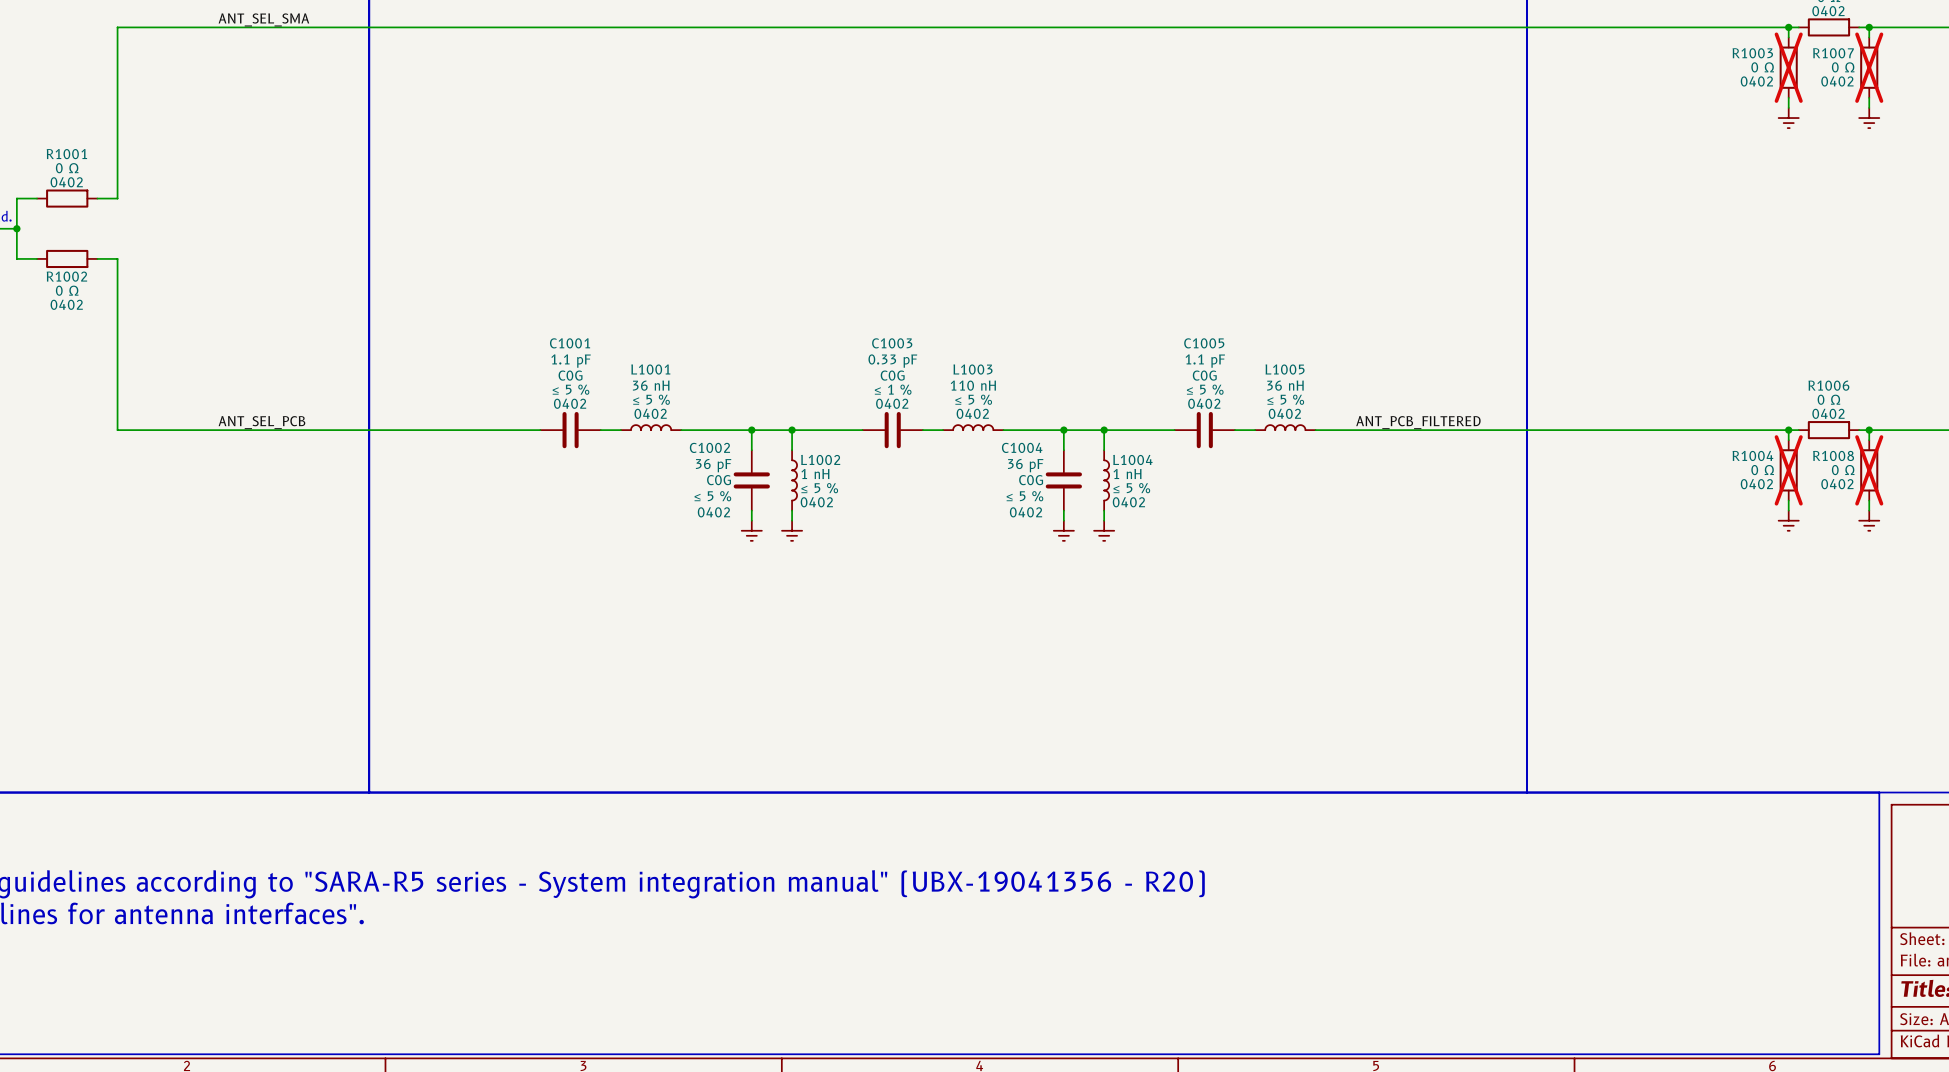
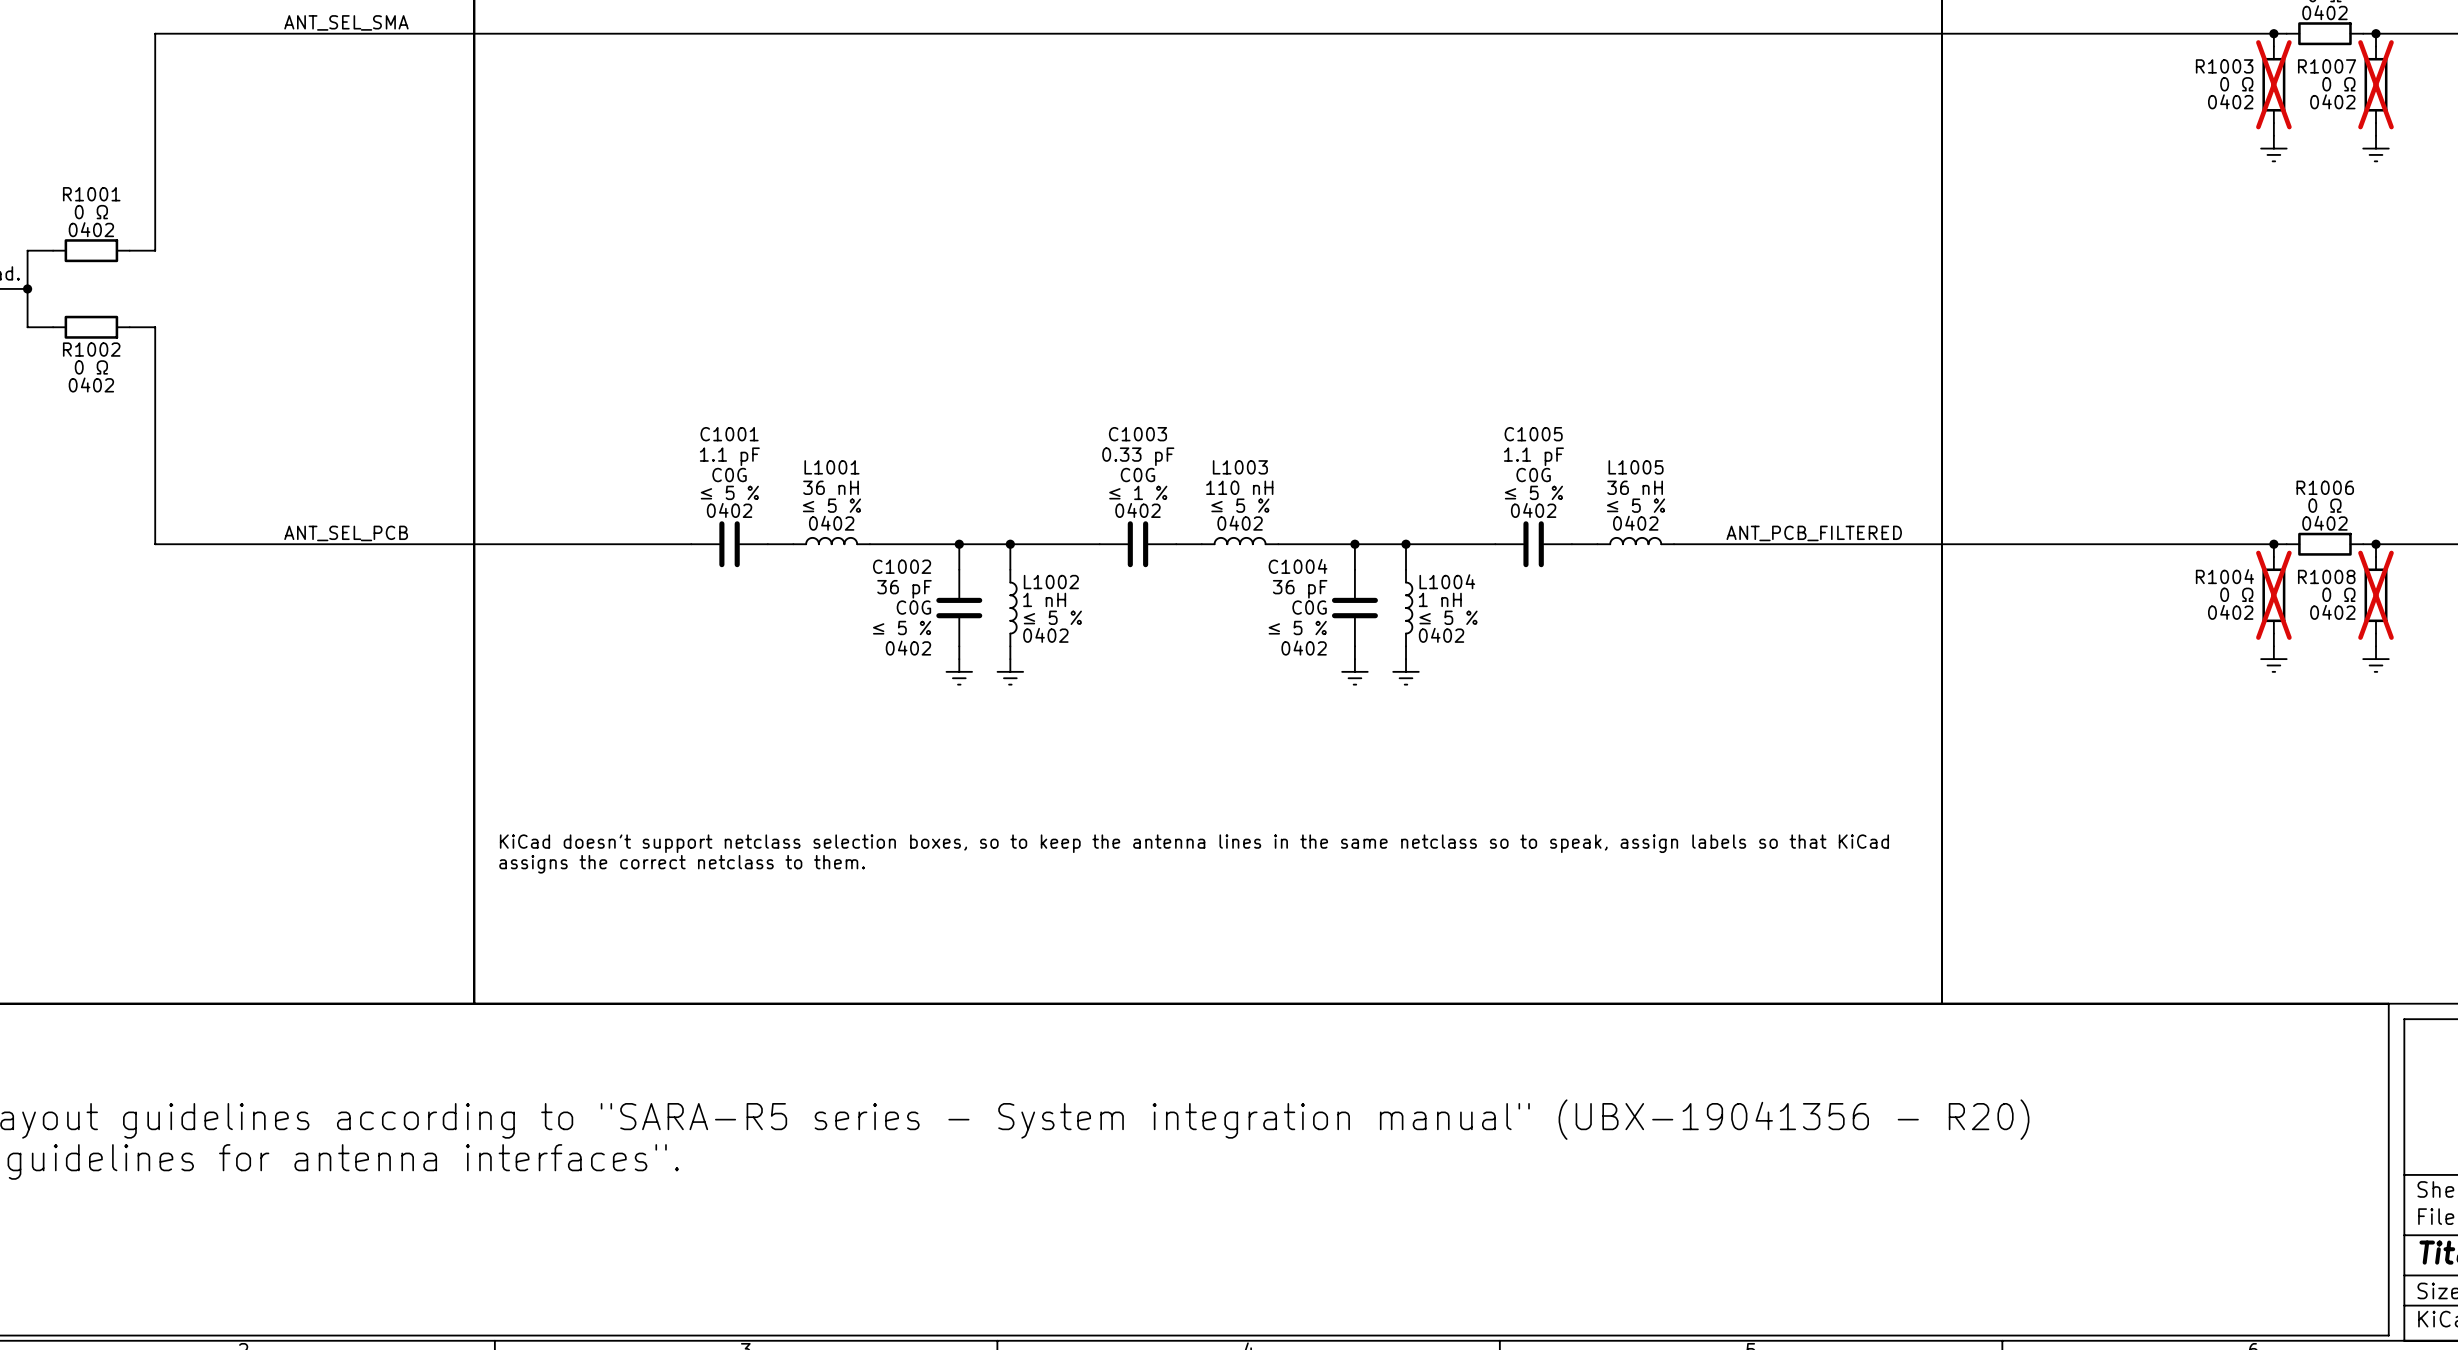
text: none -> KiCad doesn't support netclass selection boxes, so to keep the antenna lines in the same netclass so to speak, assign labels so that KiCad (1194, 843)
text: none -> assigns the correct netclass to them. (682, 864)

